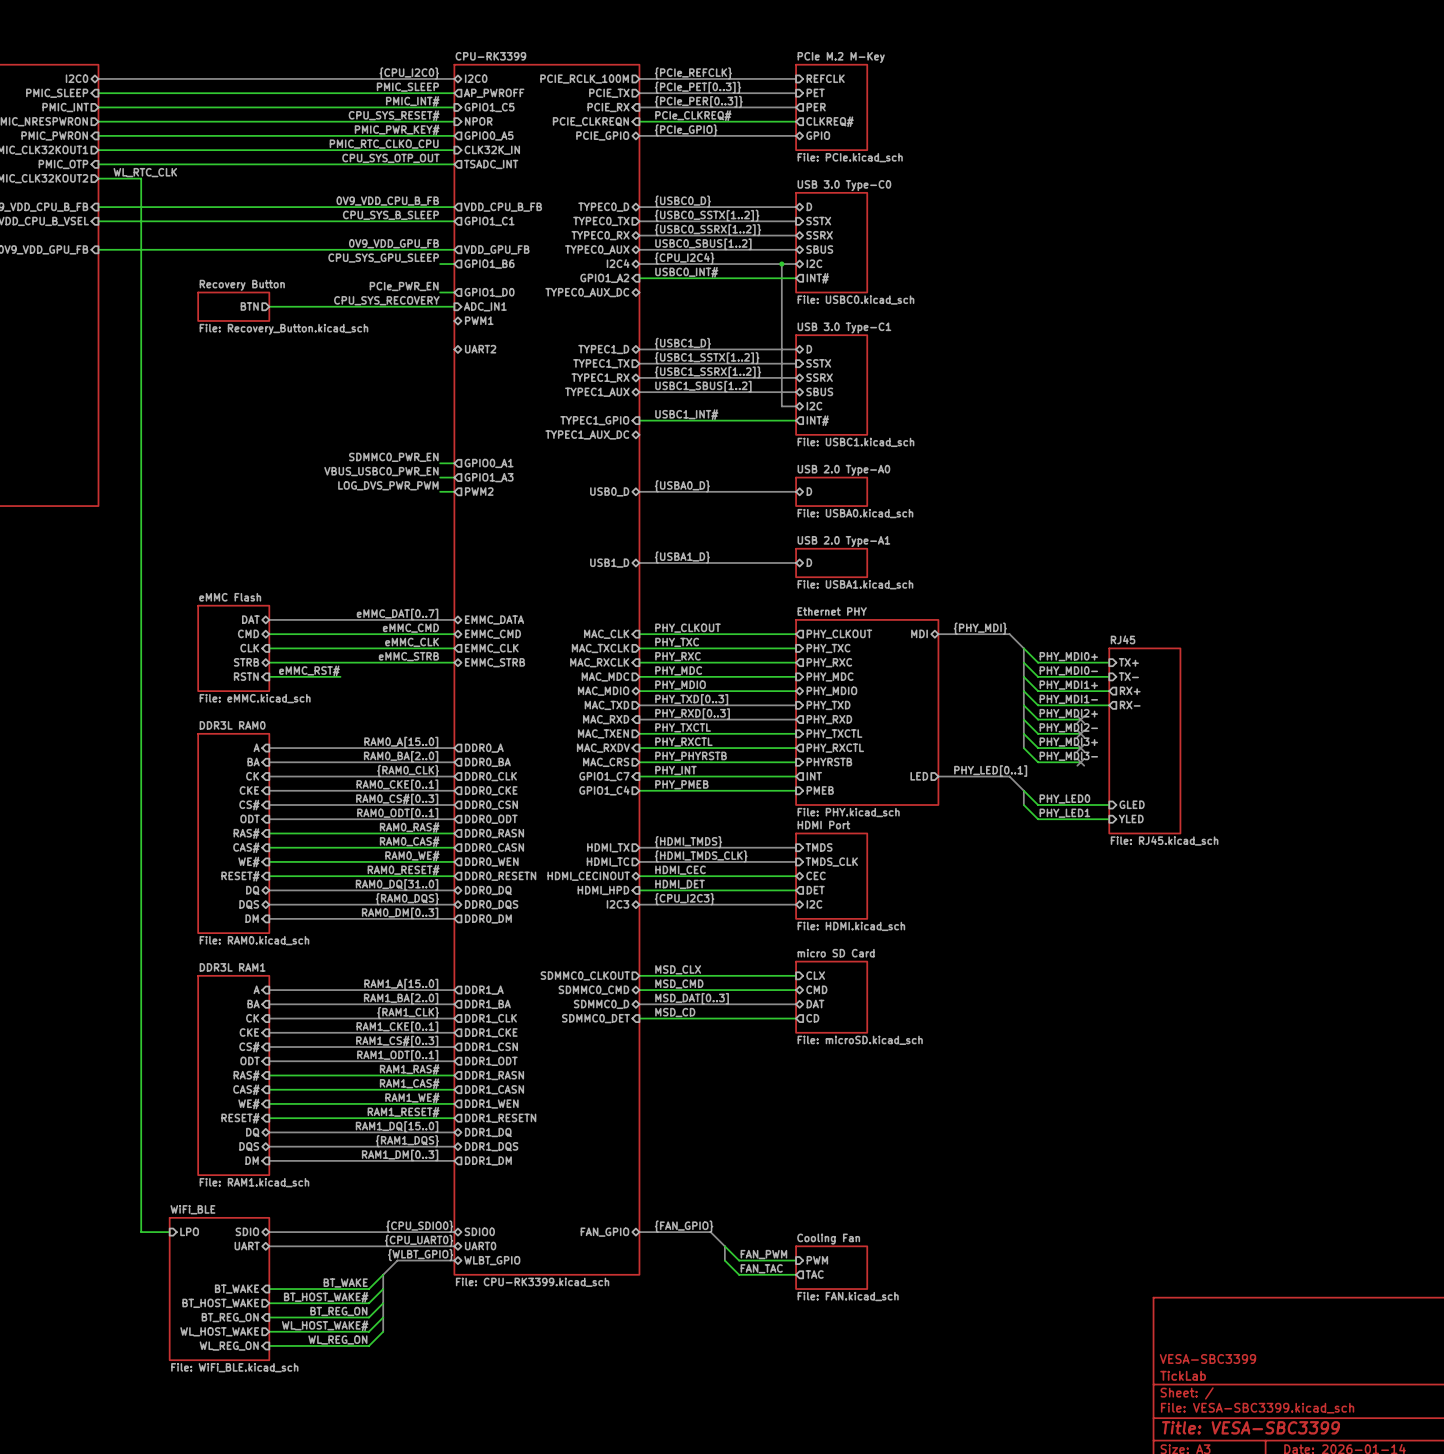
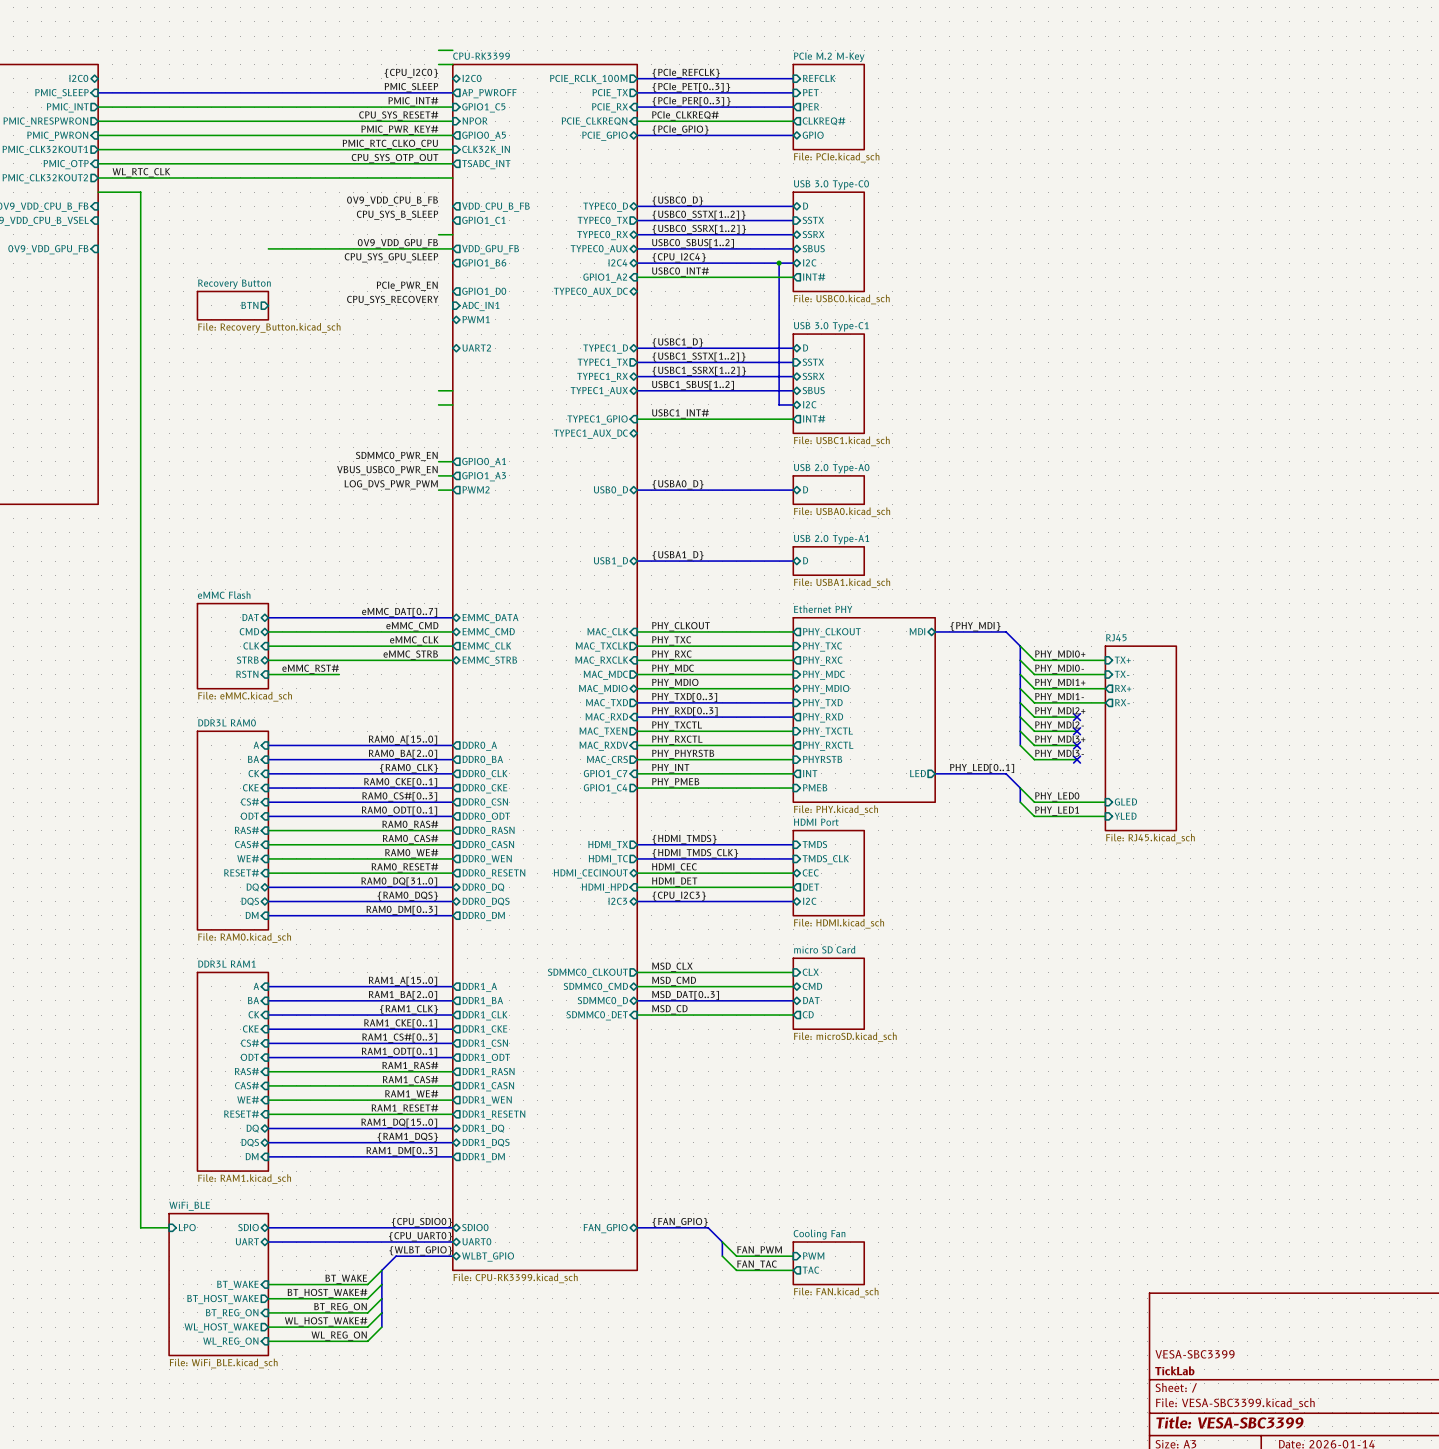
wire: none -> (438, 50) (452, 50)
wire: none -> (438, 64) (452, 64)
bus: (98, 78) (454, 78) -> (98, 92) (452, 92)
wire: (141, 178) (141, 192) -> (98, 192) (140, 192)
wire: none -> (140, 177) (452, 177)
wire: (98, 207) (454, 207) -> none
wire: (98, 221) (454, 221) -> none
wire: (98, 249) (269, 249) -> none
wire: (440, 264) (454, 264) -> (438, 234) (452, 234)
wire: (440, 292) (454, 292) -> (438, 390) (452, 390)
wire: (269, 306) (454, 306) -> none
wire: none -> (438, 404) (452, 404)

